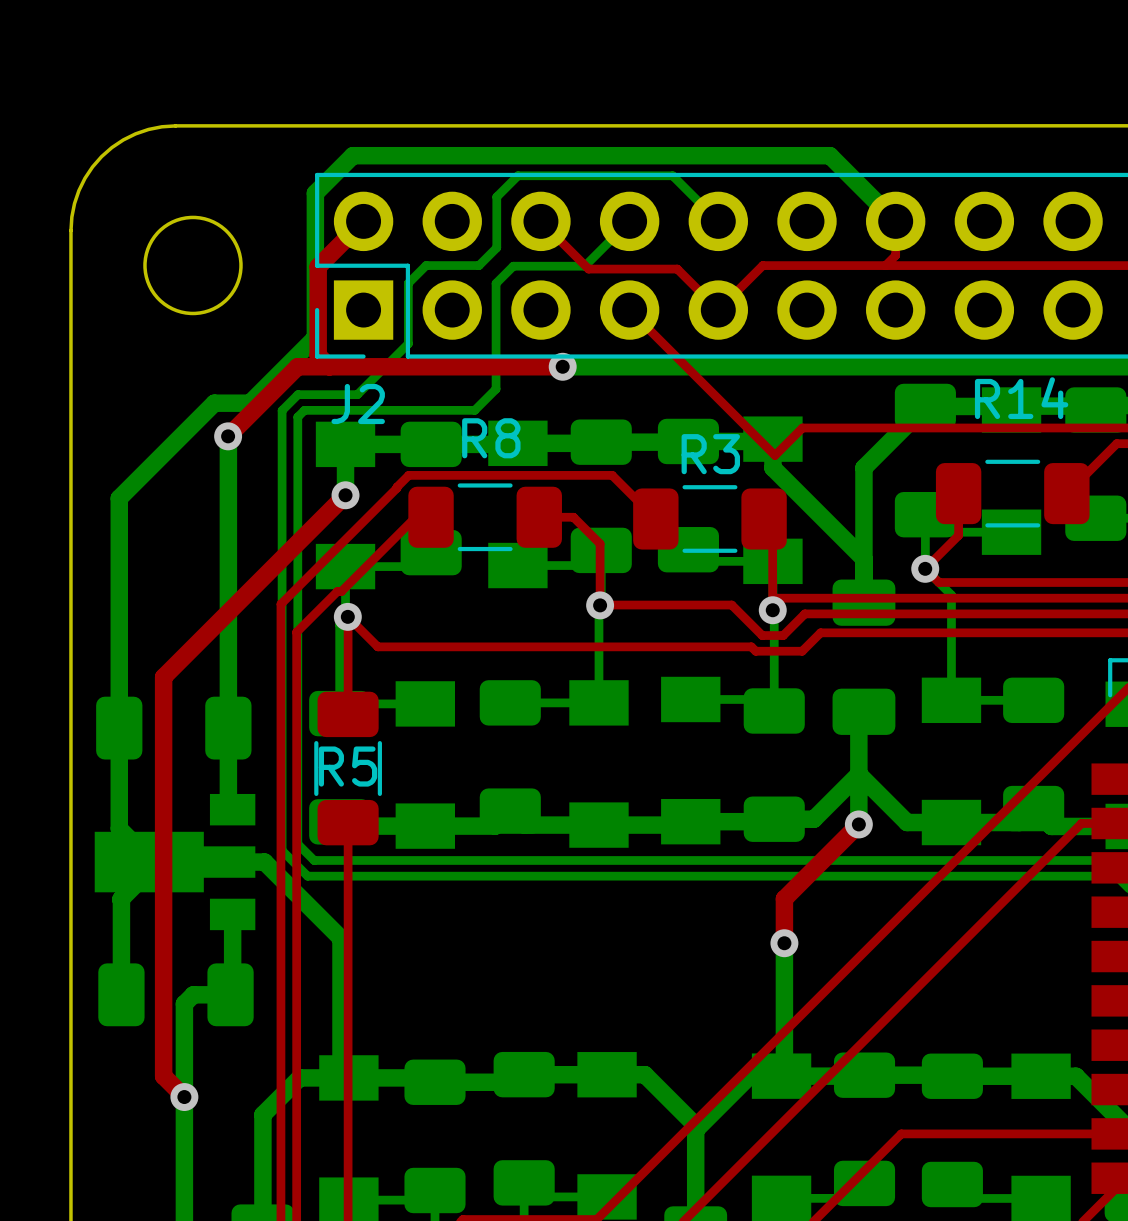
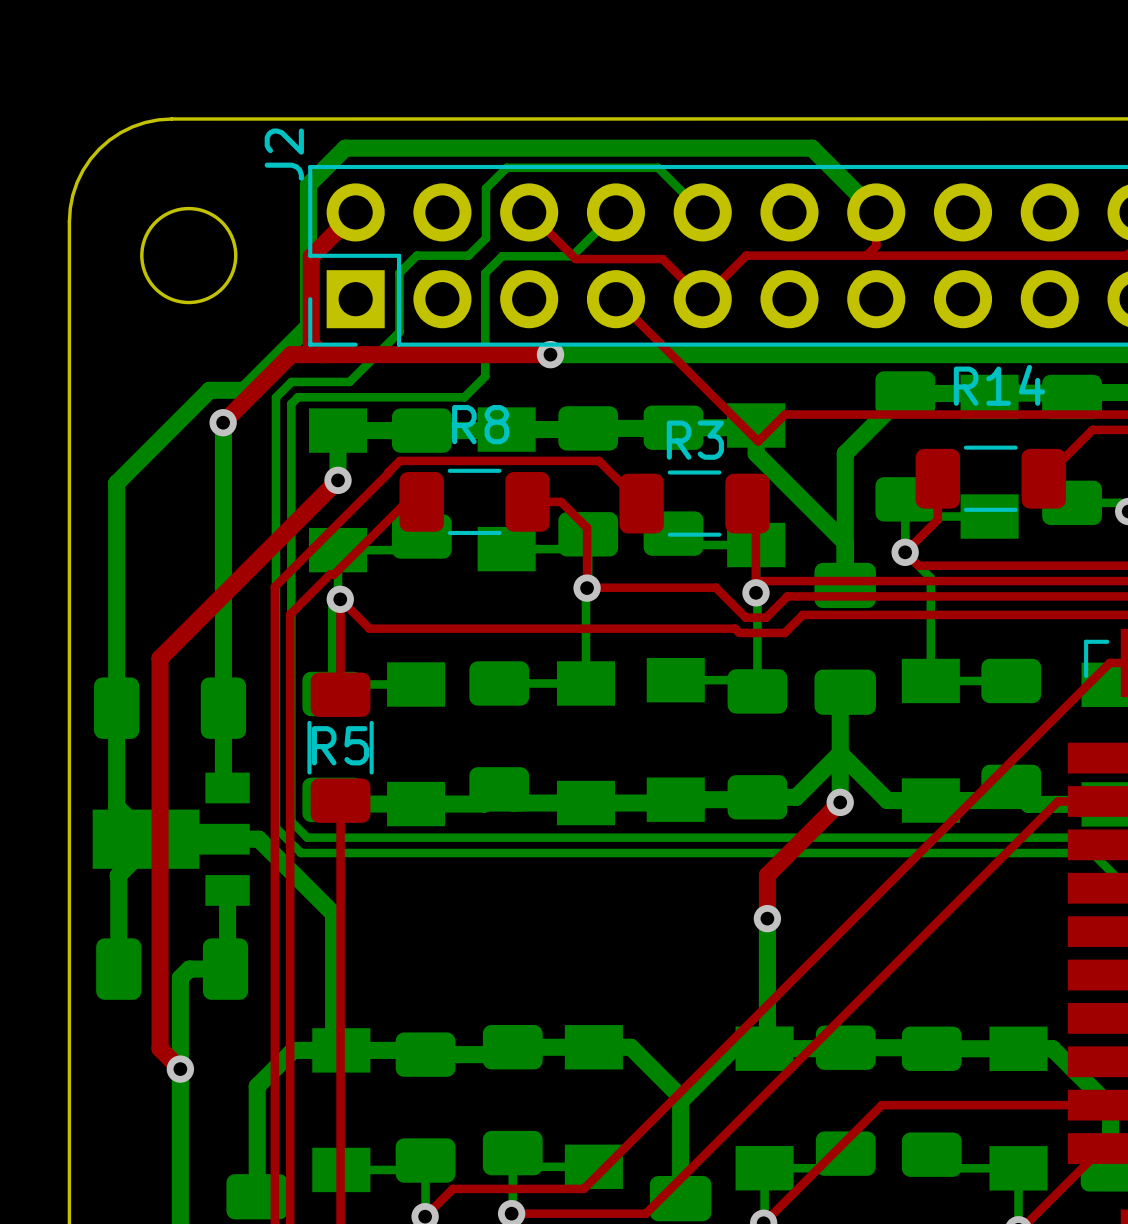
J2 name rotation: 0° (358, 404) -> 90° counterclockwise (284, 154)
J2 name position: J2 (358, 404) -> J2 (284, 154)

